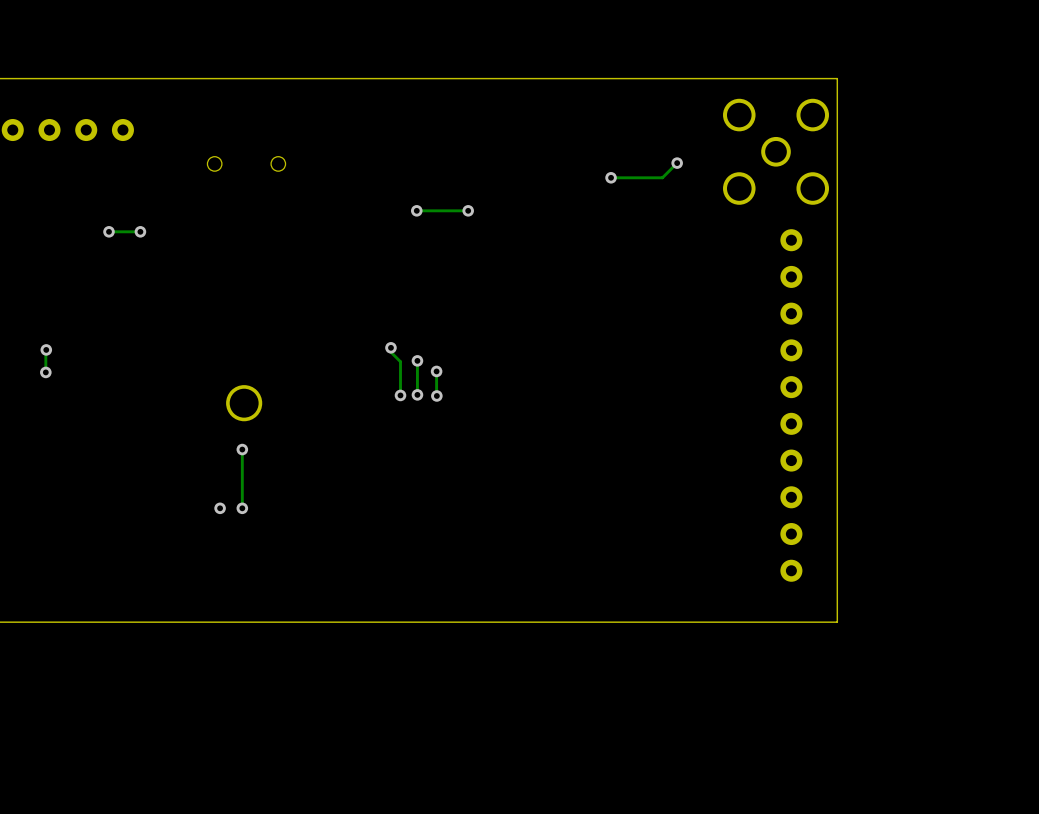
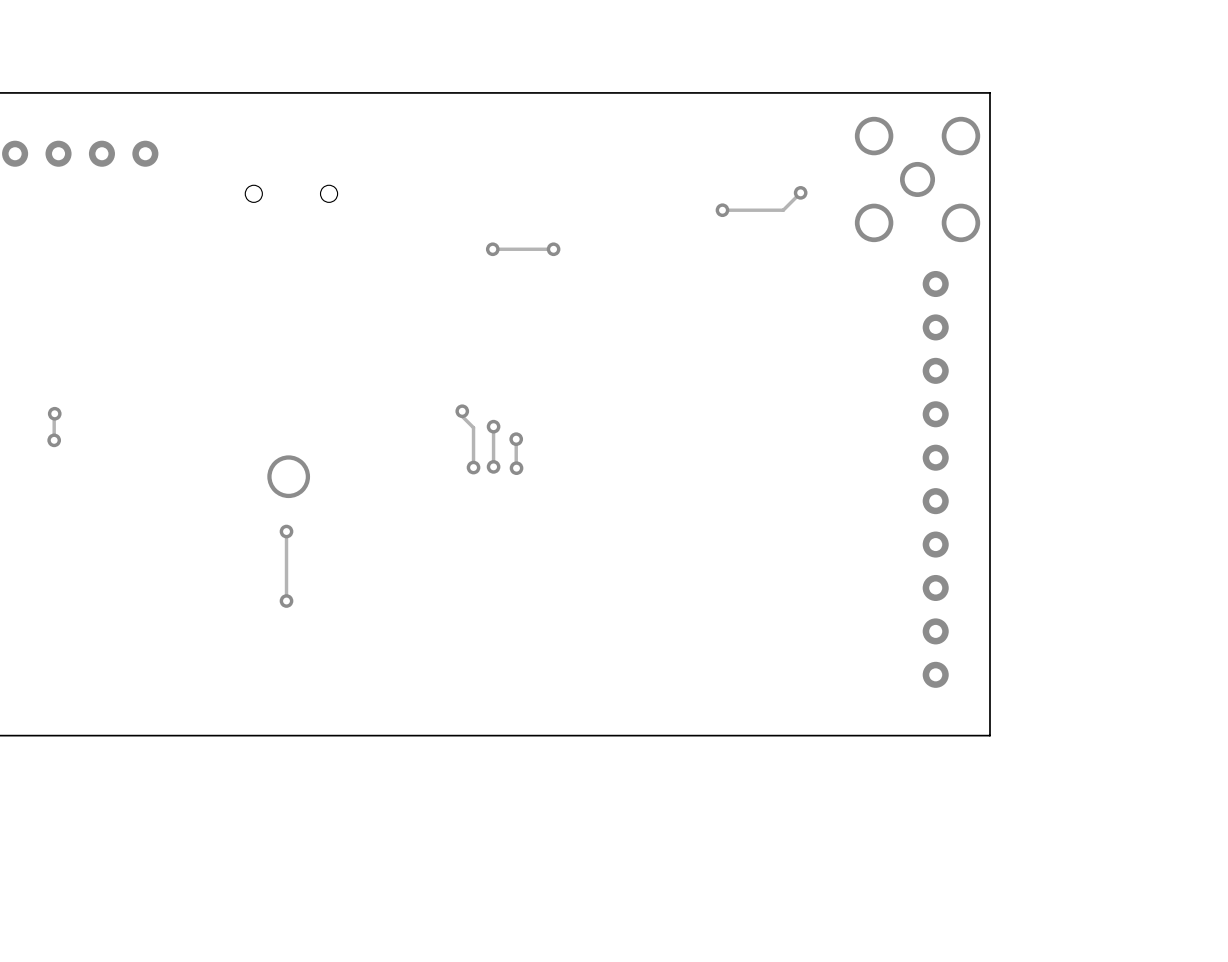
via: (109, 231) -> none
track: (140, 231) (109, 231) -> none
via: (140, 231) -> none
via: (220, 508) -> none

